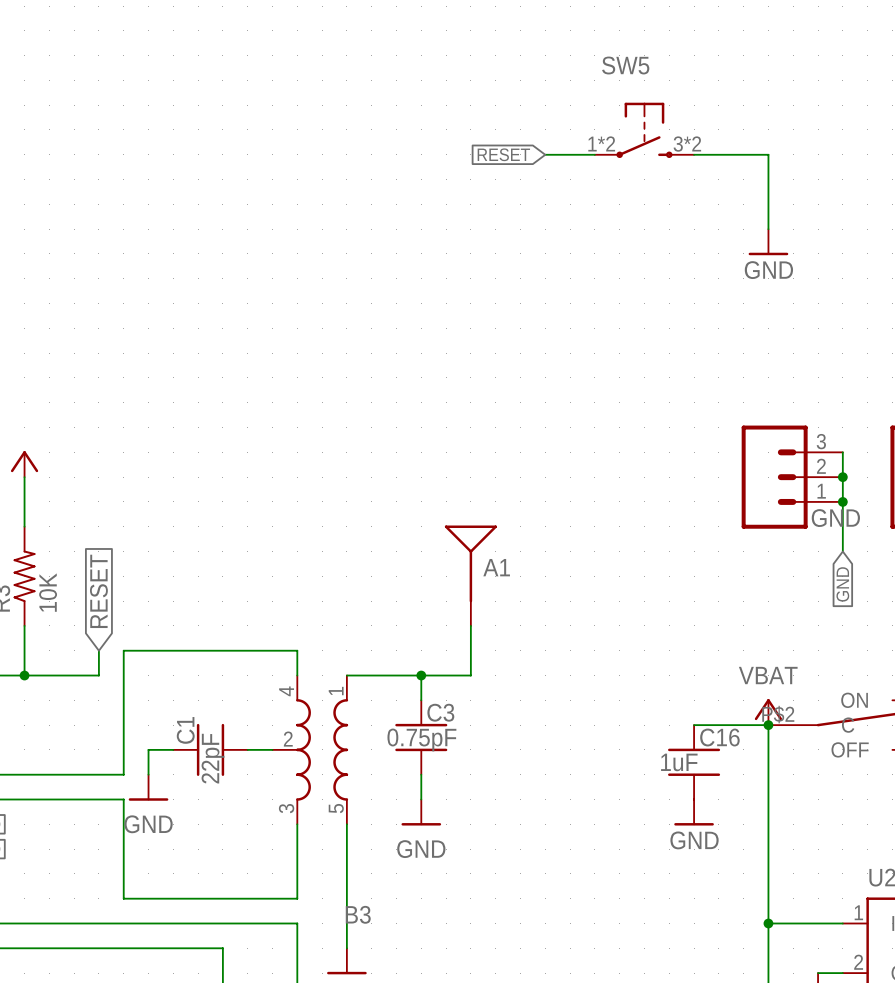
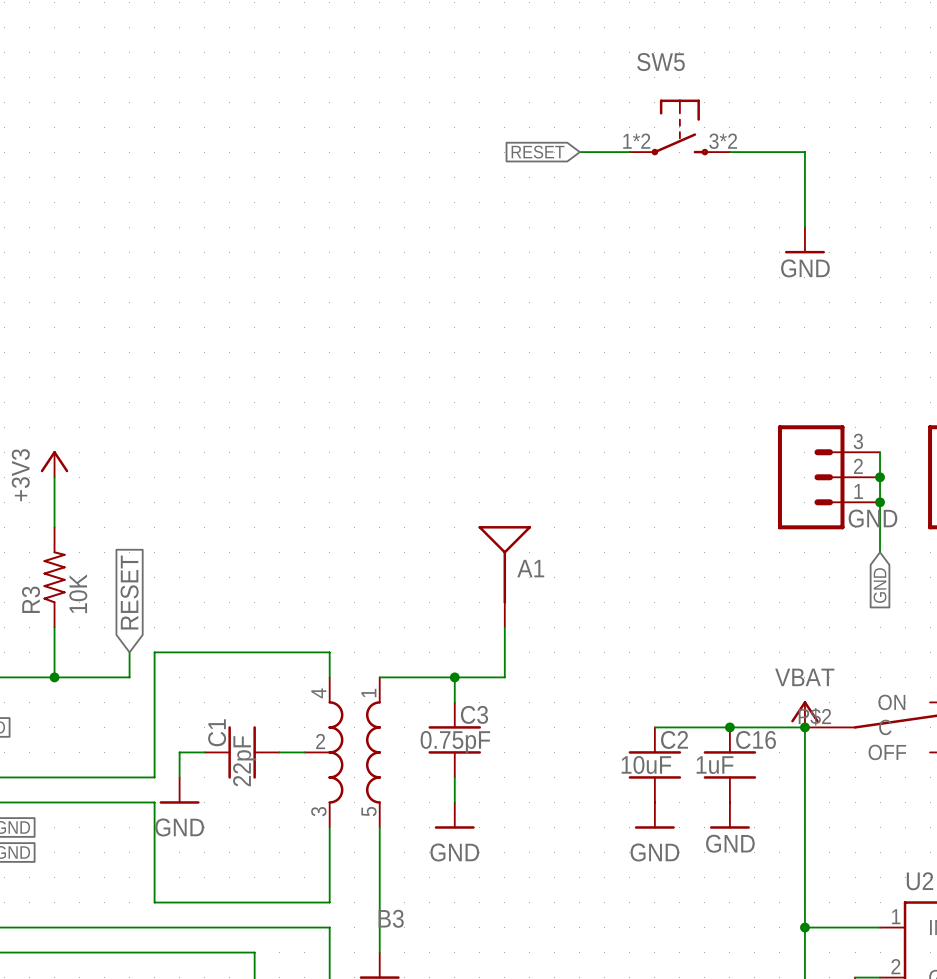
wire: none -> (654, 727) (729, 727)
junction: none -> (729, 727)
C2: none -> 10uF (654, 764)
power symbol: none -> GND (654, 815)

